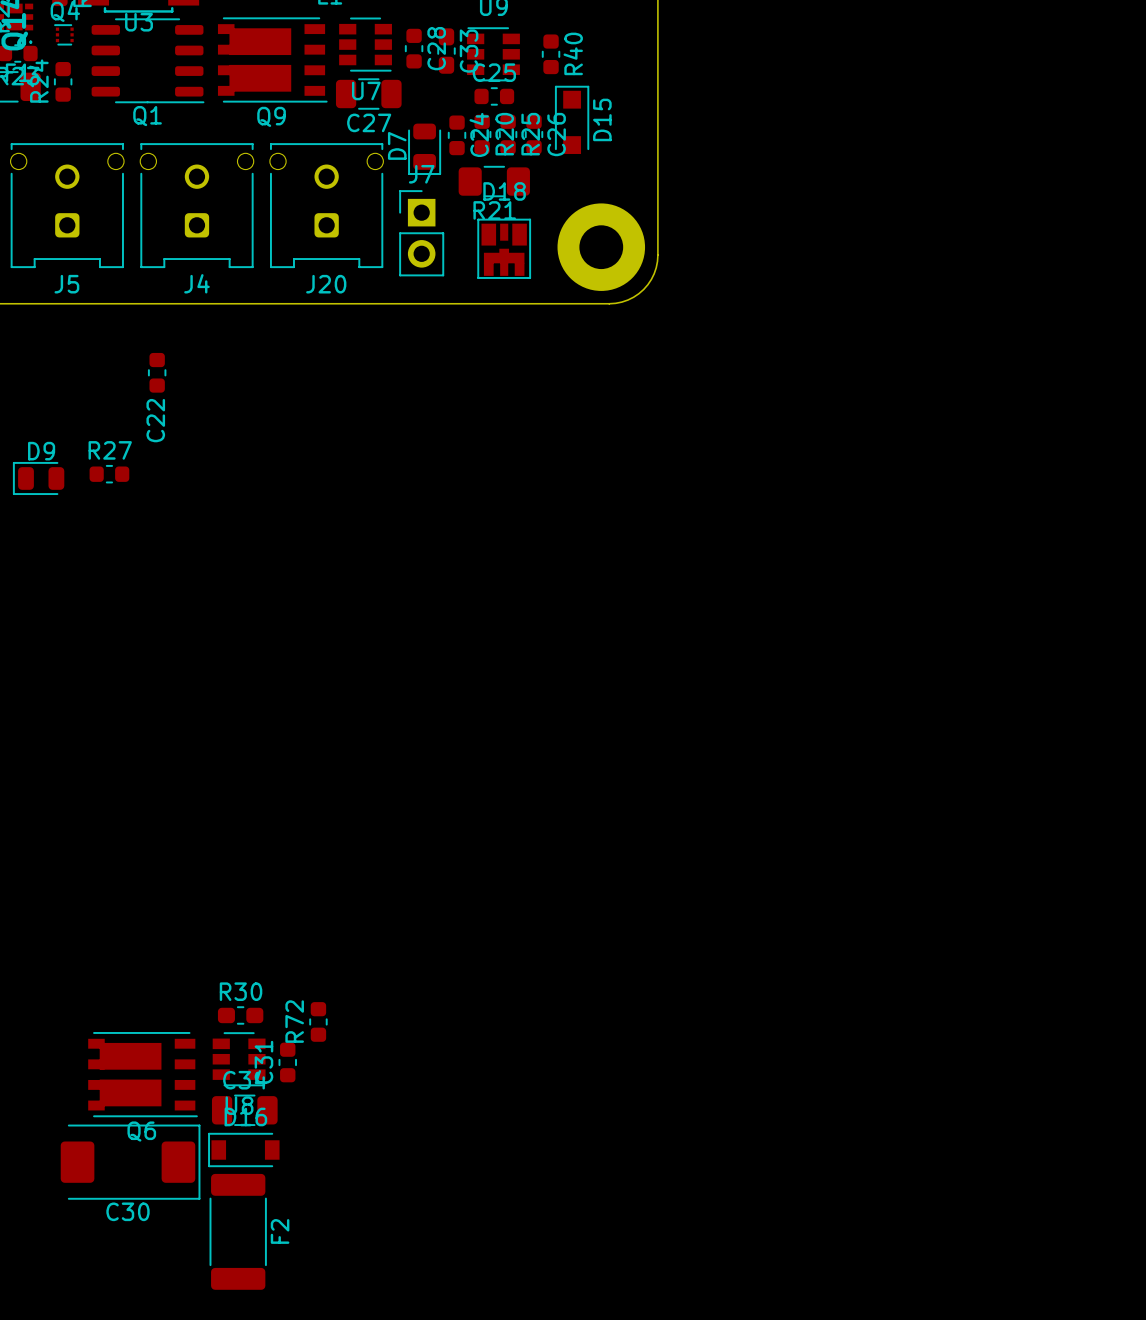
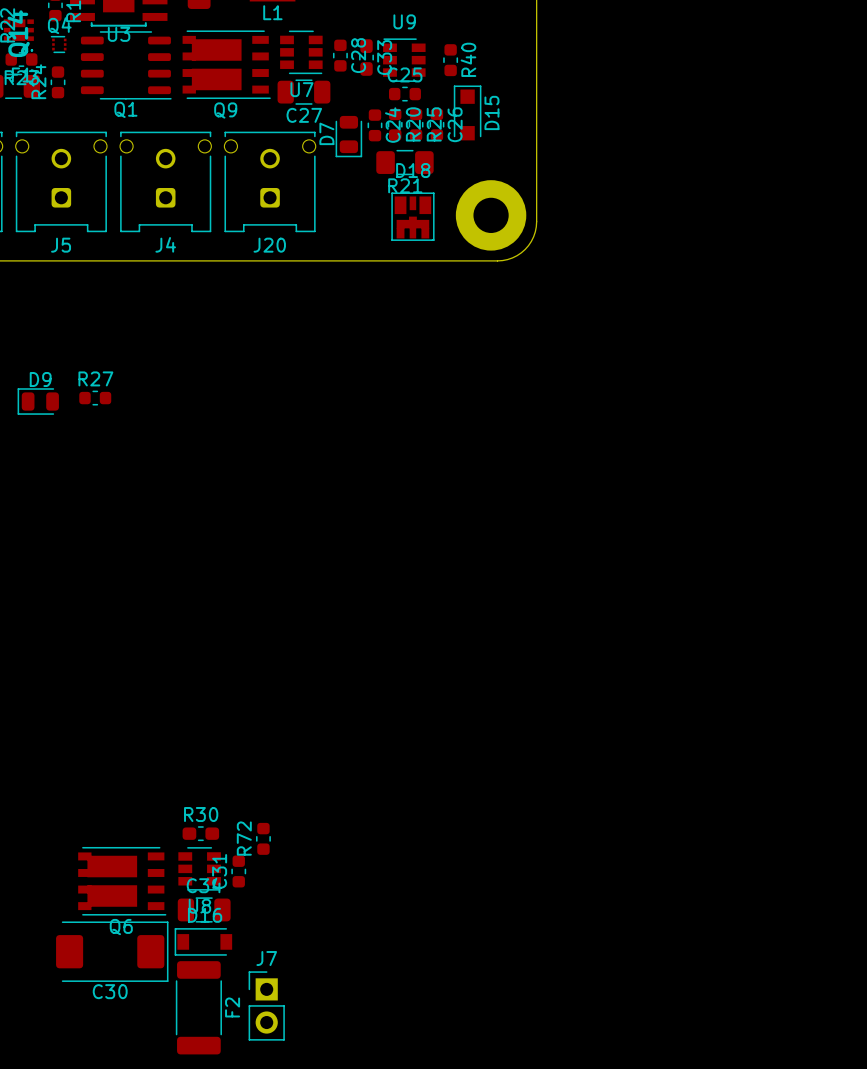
J7 position: (421, 233) -> (266, 1005)
C22: (157, 372) -> none

